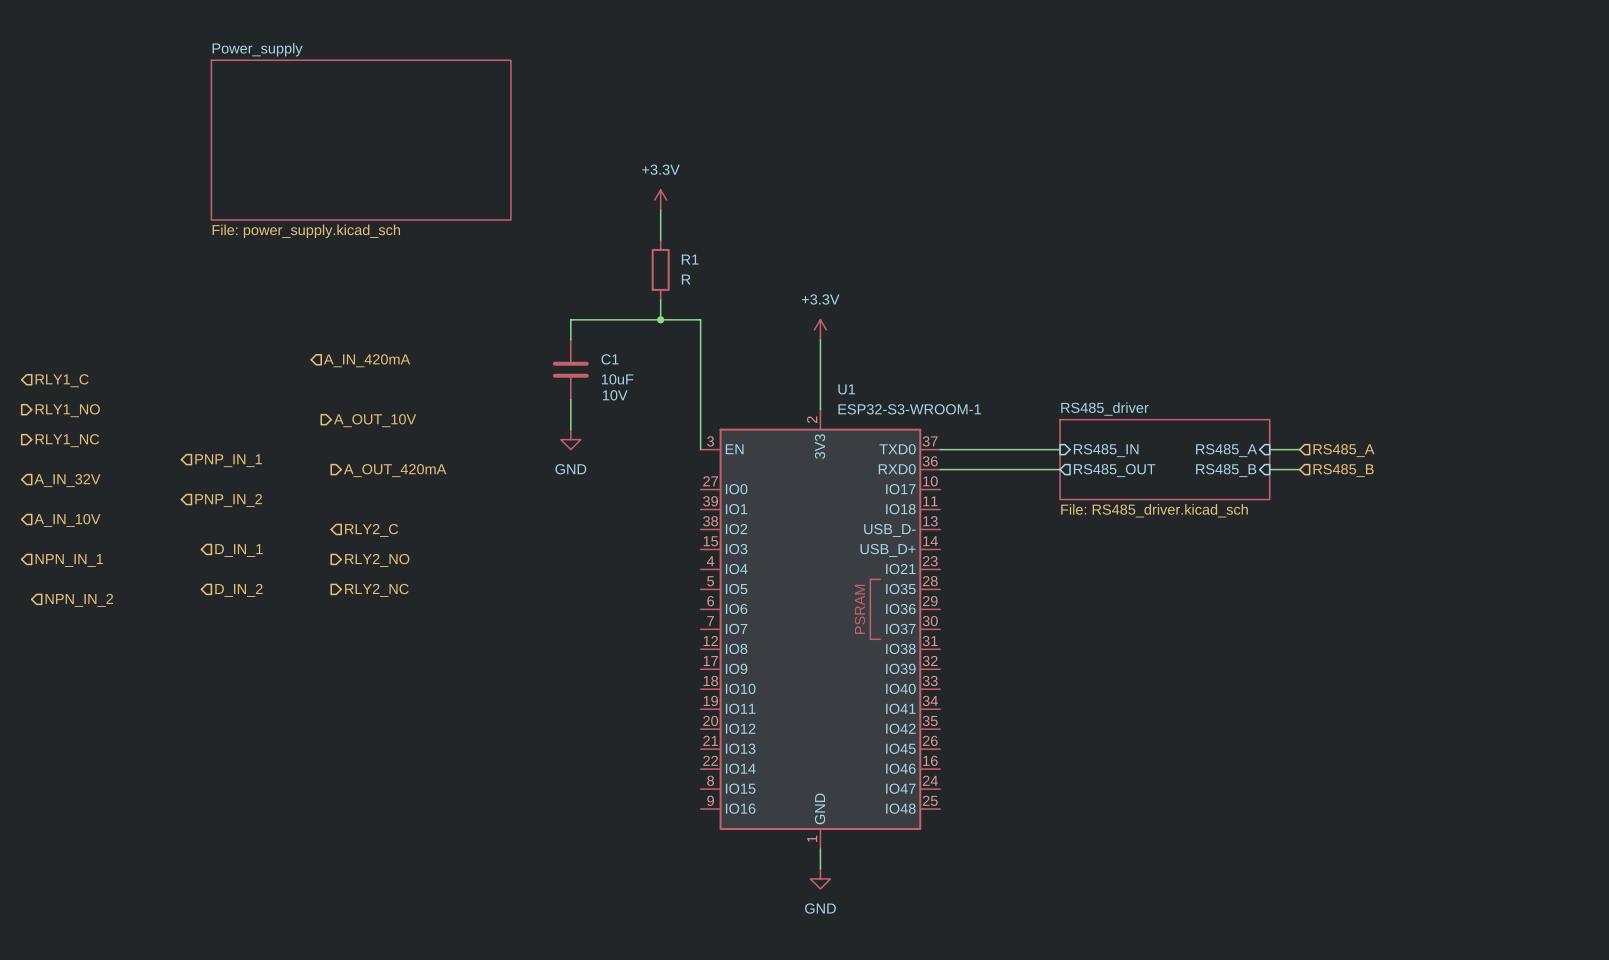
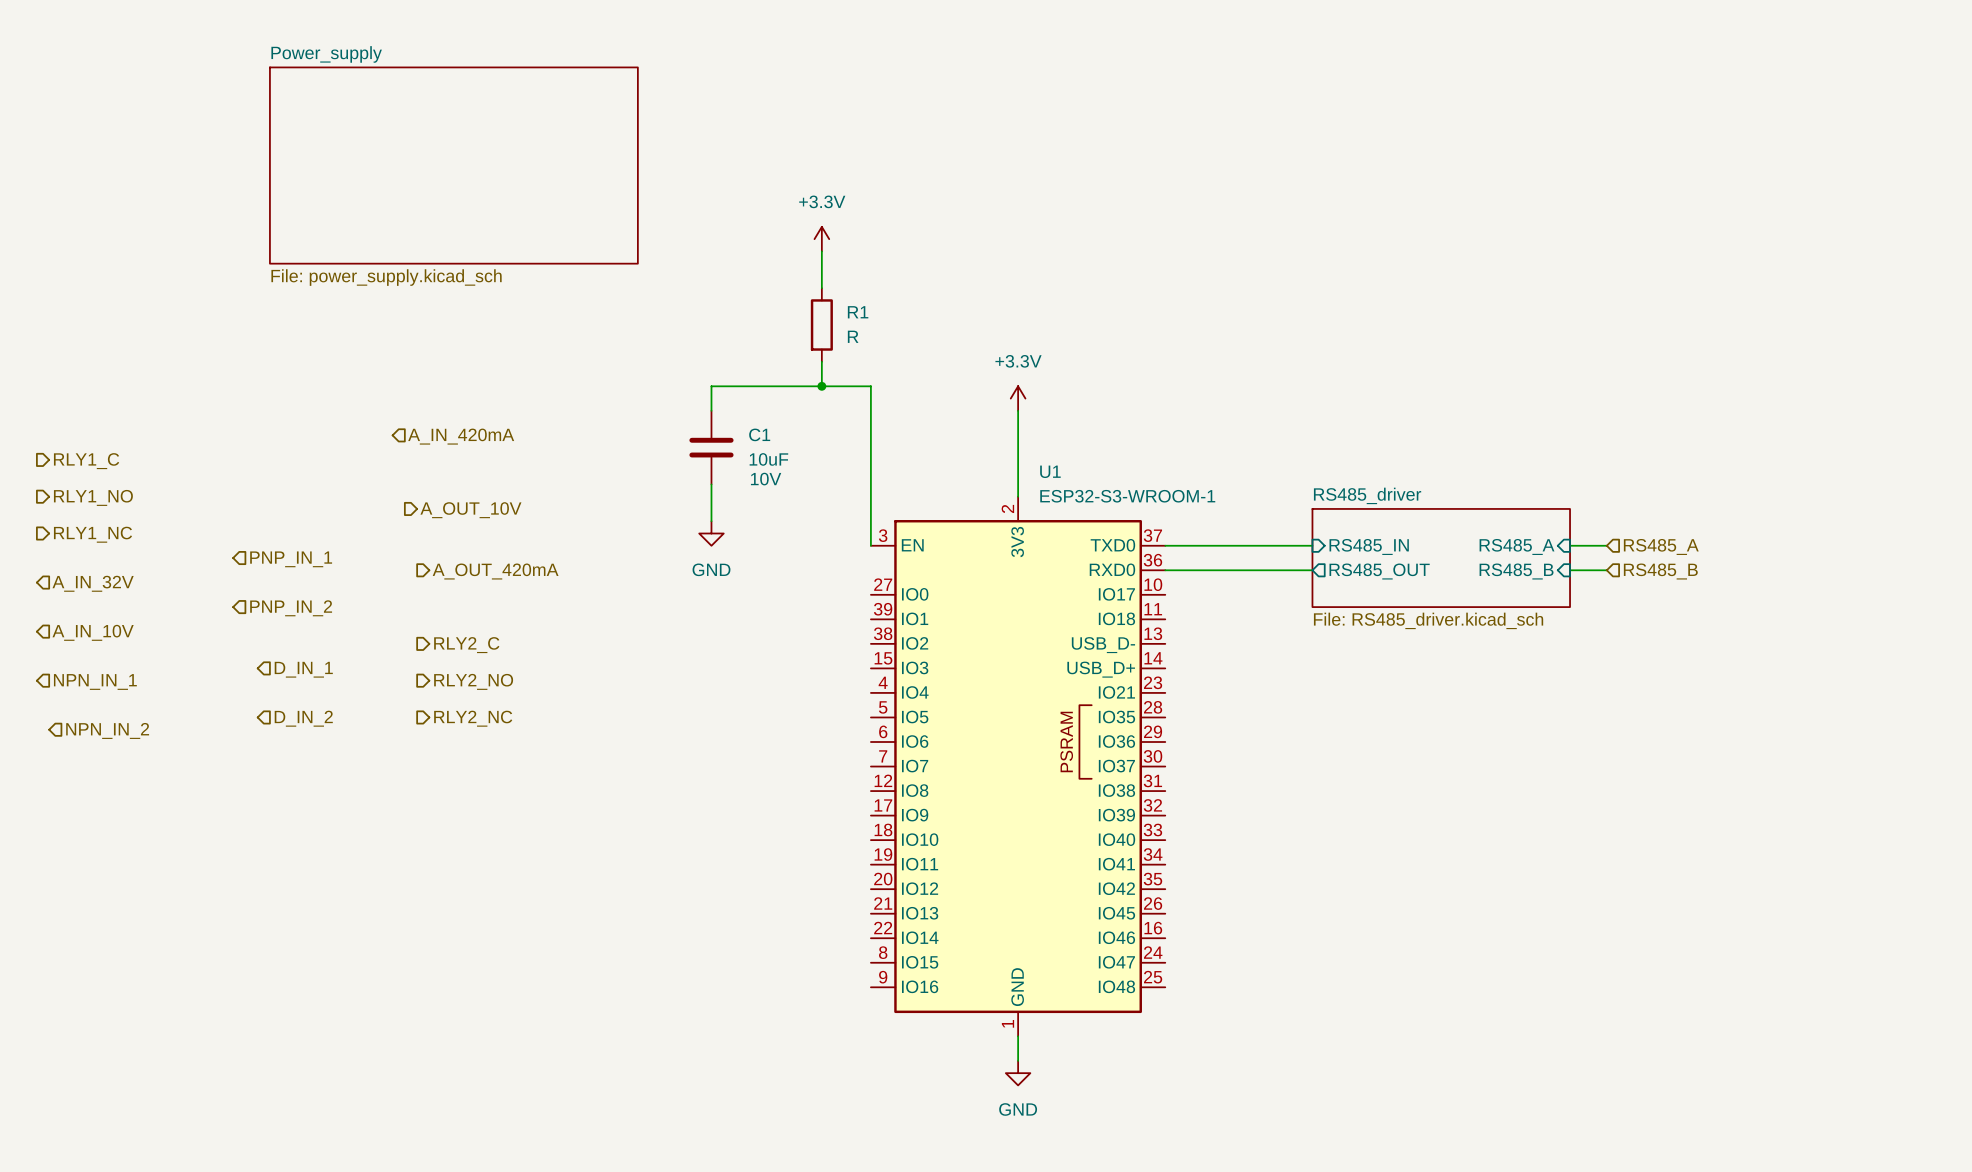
hierarchical label shape: input (62, 380) -> output (86, 461)
hierarchical label shape: input (371, 530) -> output (466, 645)

